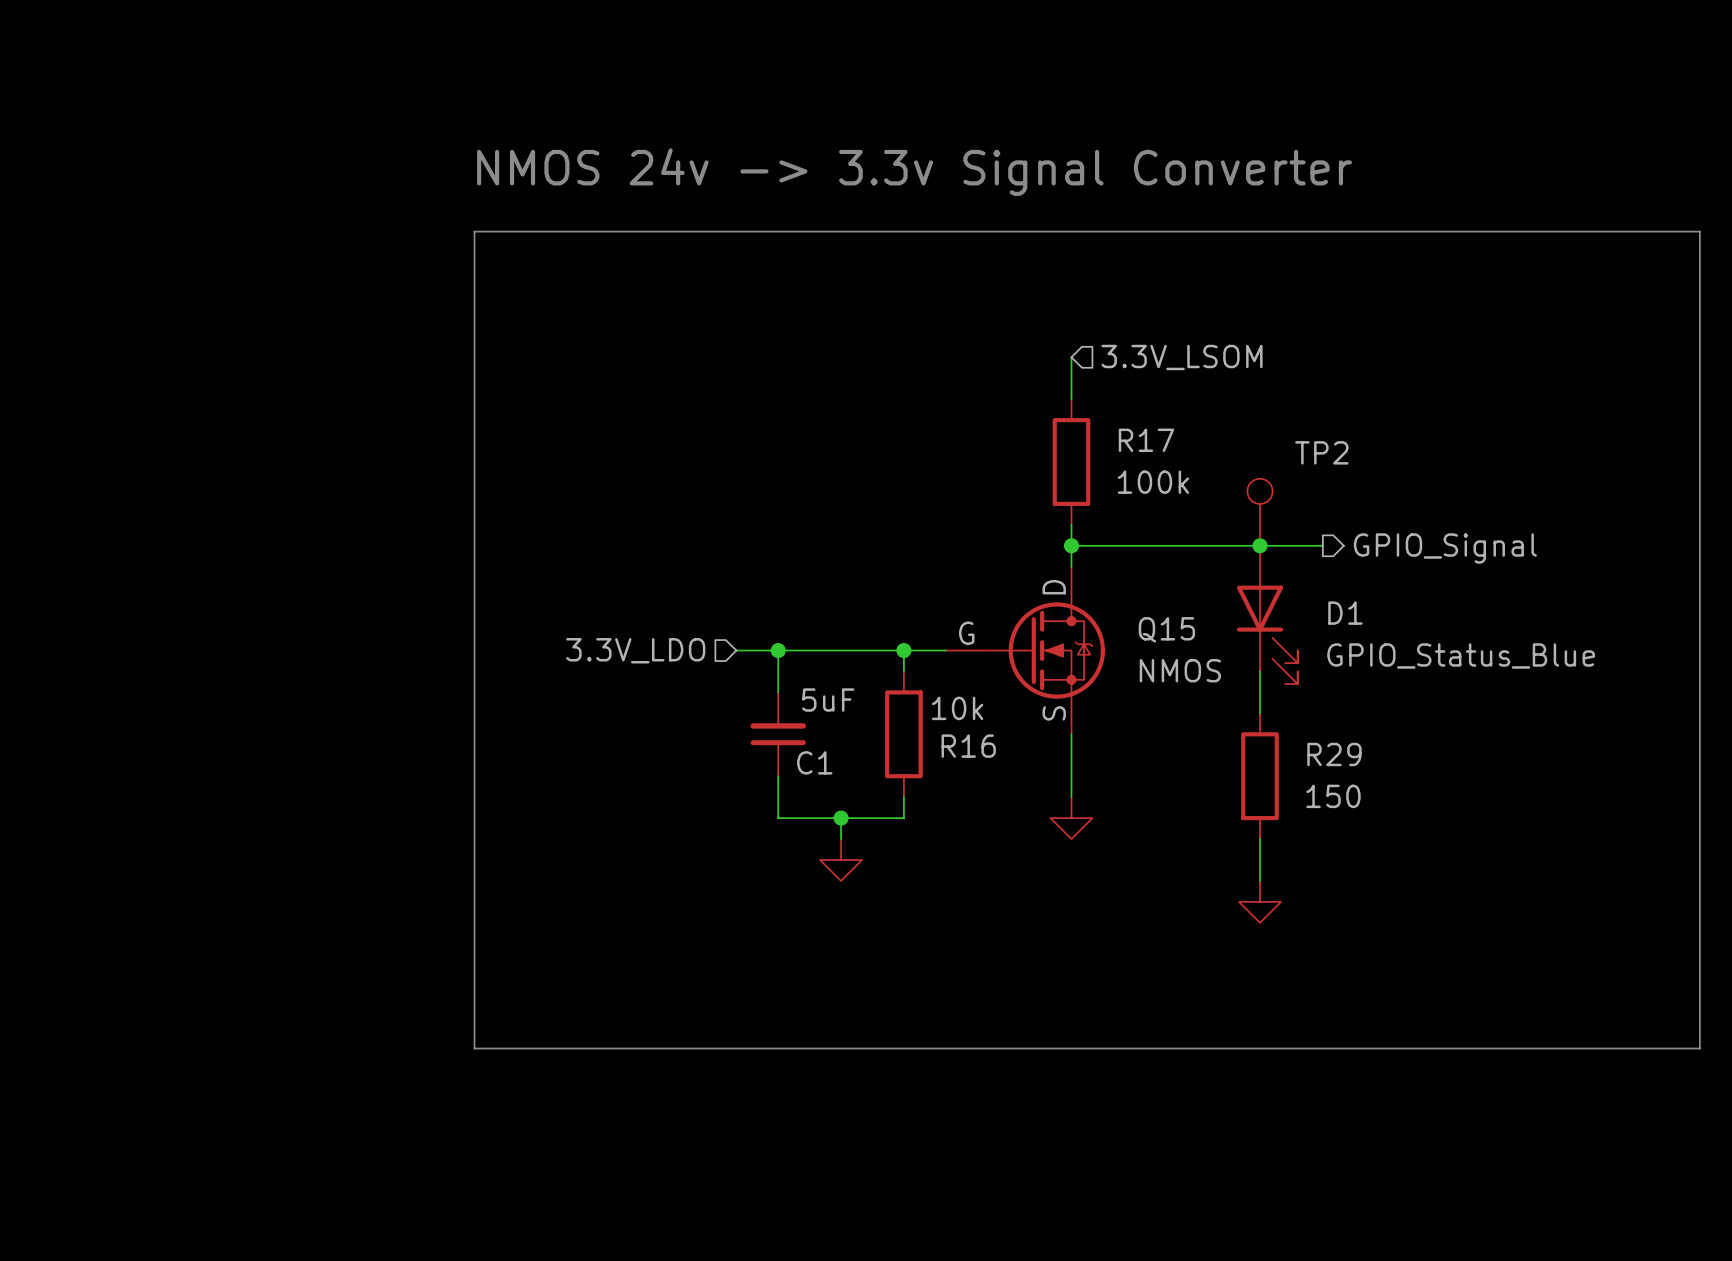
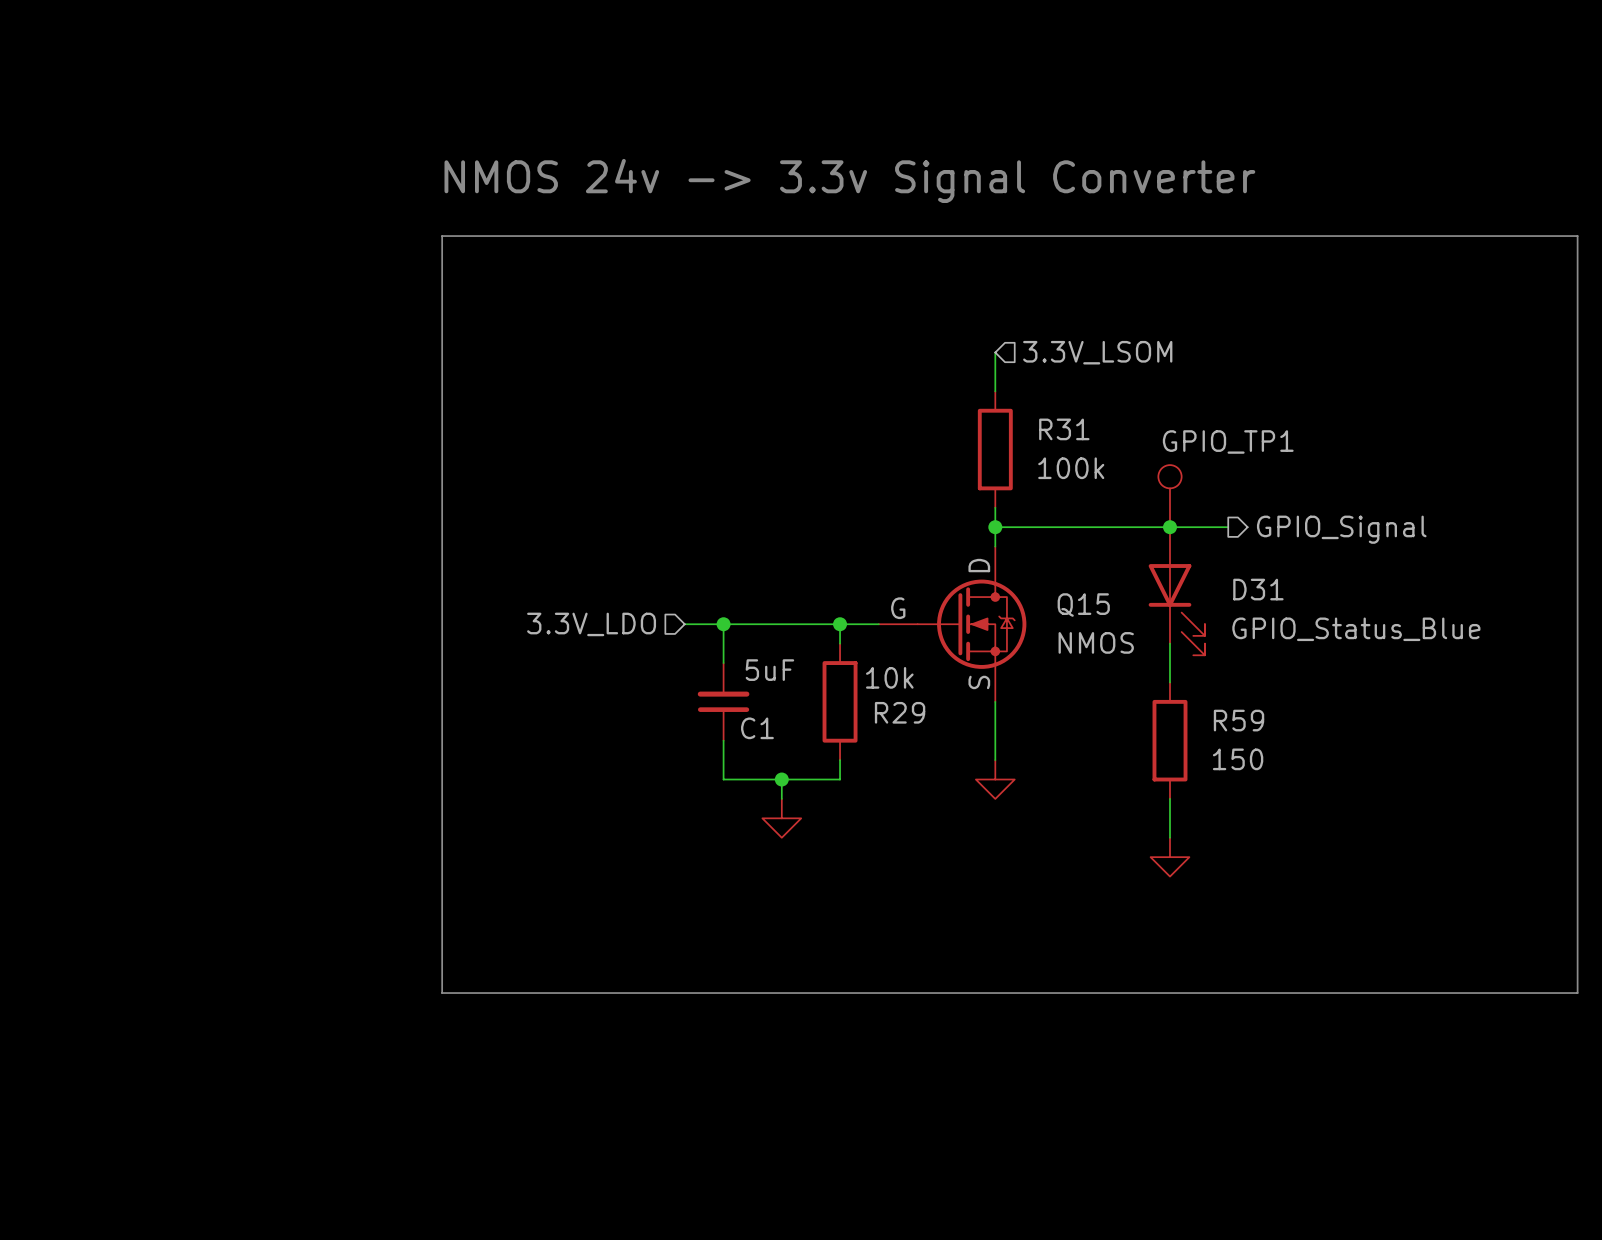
R17 name: R17 (1146, 440) -> R31 (1064, 429)
TP2 name: TP2 (1321, 452) -> GPIO_TP1 (1228, 441)
D1 name: D1 (1345, 613) -> D31 (1258, 589)
R16 name: R16 (968, 746) -> R29 (900, 712)
R29 name: R29 (1334, 754) -> R59 (1239, 720)

